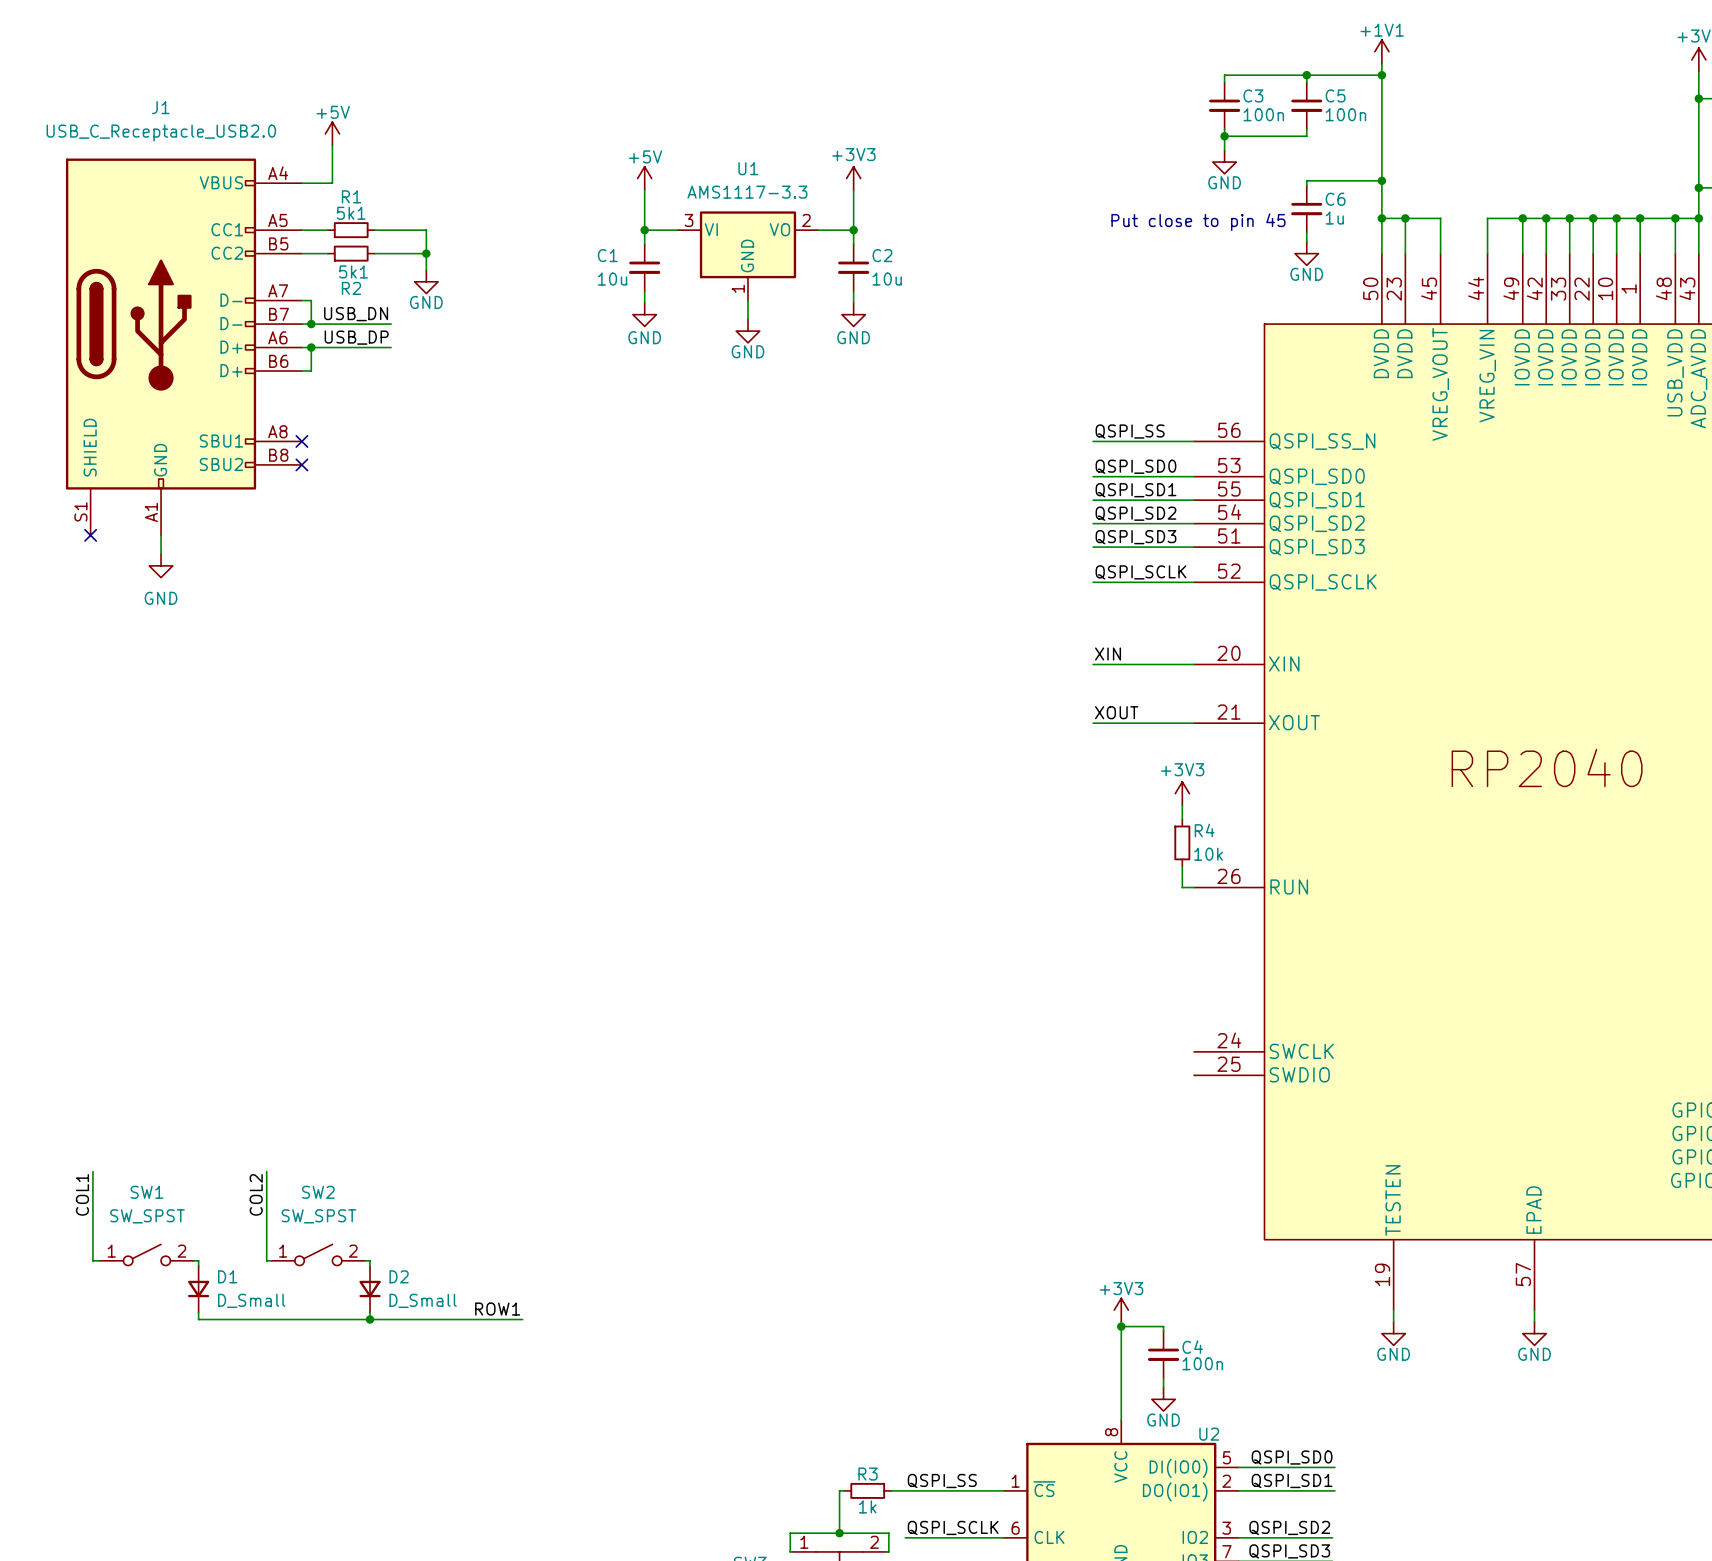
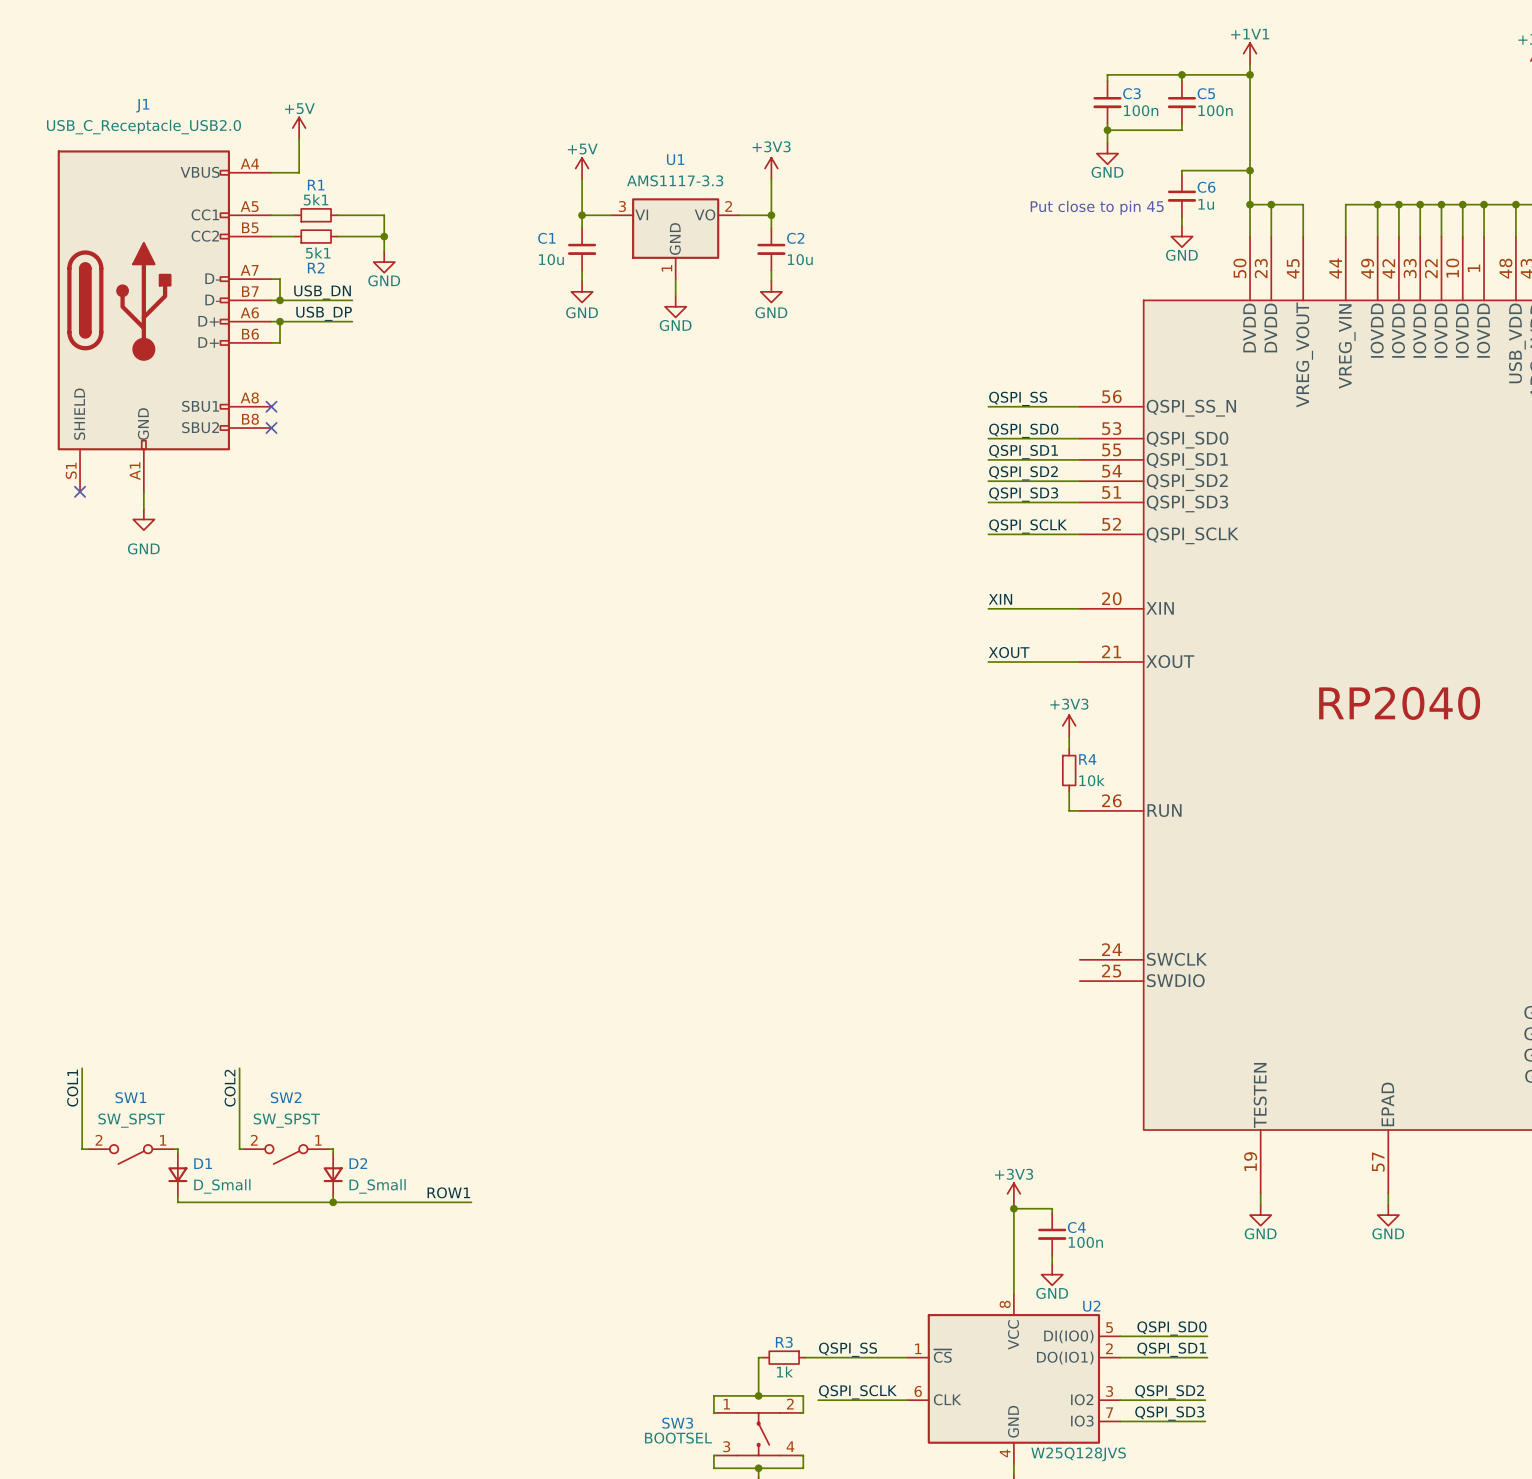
SW1 rotation: 0° (146, 1254) -> 180° (131, 1154)
SW2 rotation: 0° (318, 1254) -> 180° (286, 1154)

